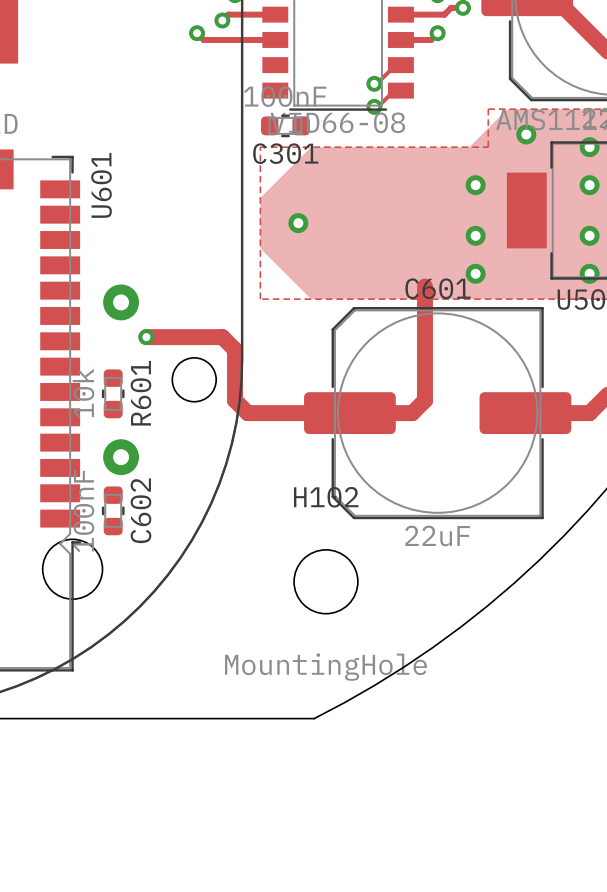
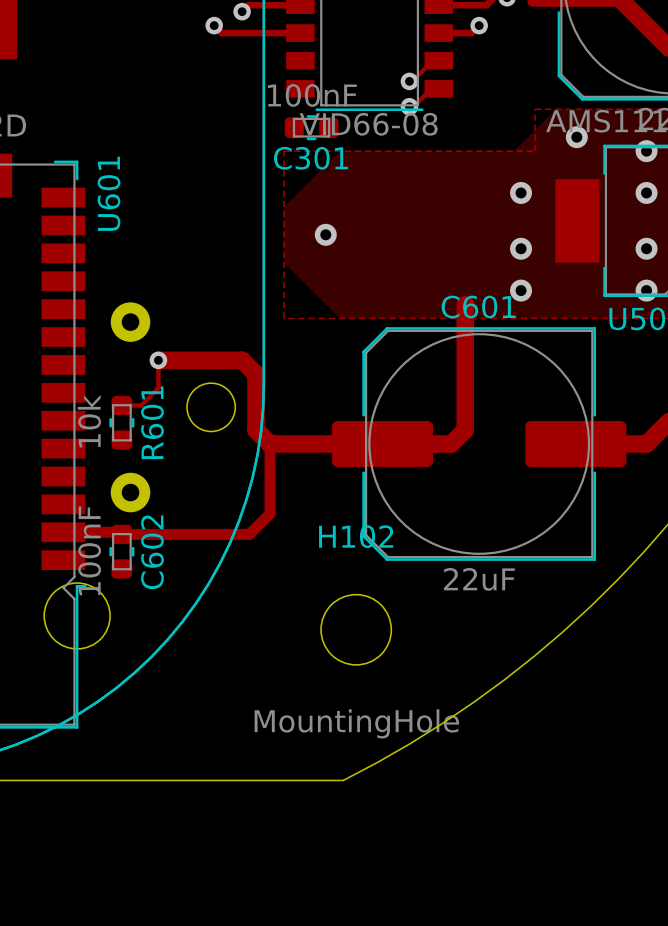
track: none -> (158, 360) (158, 388) (141, 405) (121, 405)
track: none -> (270, 444) (270, 513) (249, 534) (63, 532)

